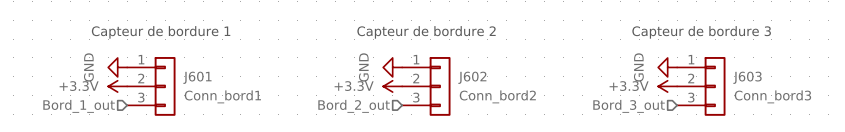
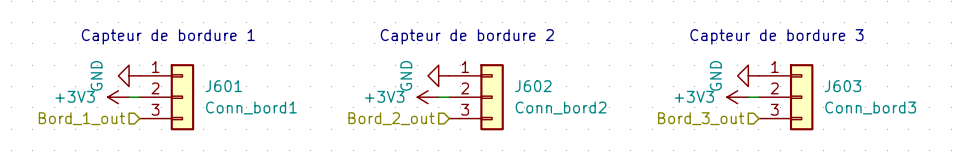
power symbol: none -> +3V3 (118, 97)
power symbol: +3.3V (117, 86) -> none
power symbol: none -> +3V3 (428, 97)
power symbol: +3.3V (392, 86) -> none
power symbol: none -> +3V3 (737, 97)
power symbol: +3.3V (667, 86) -> none

